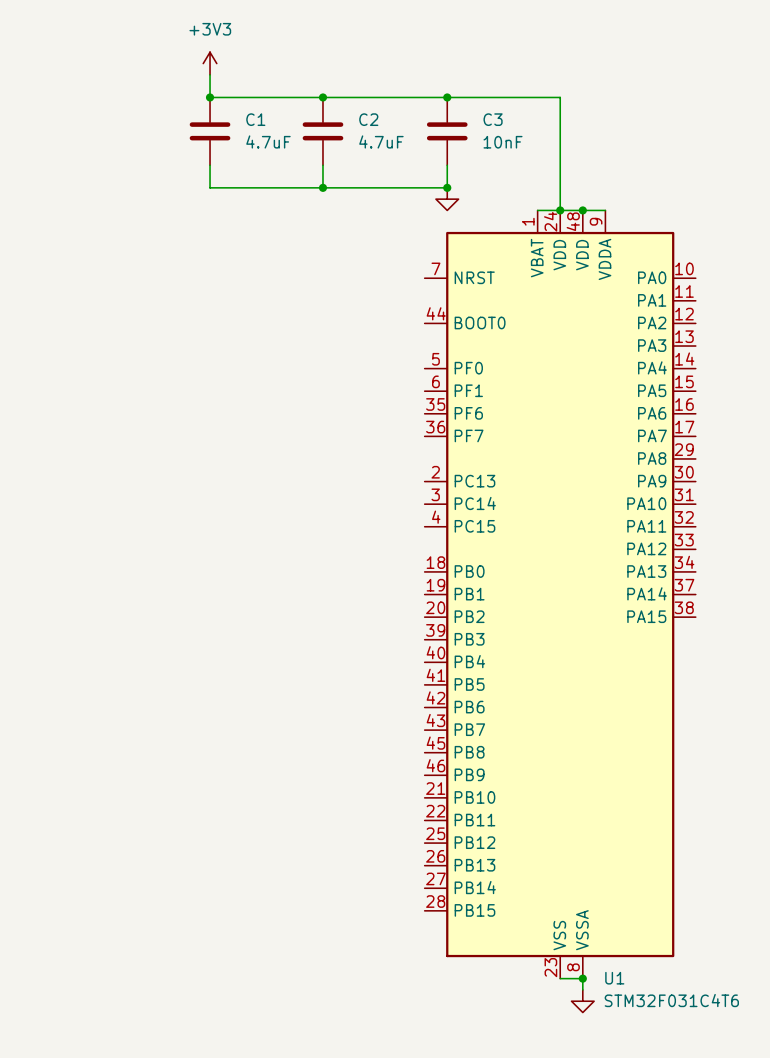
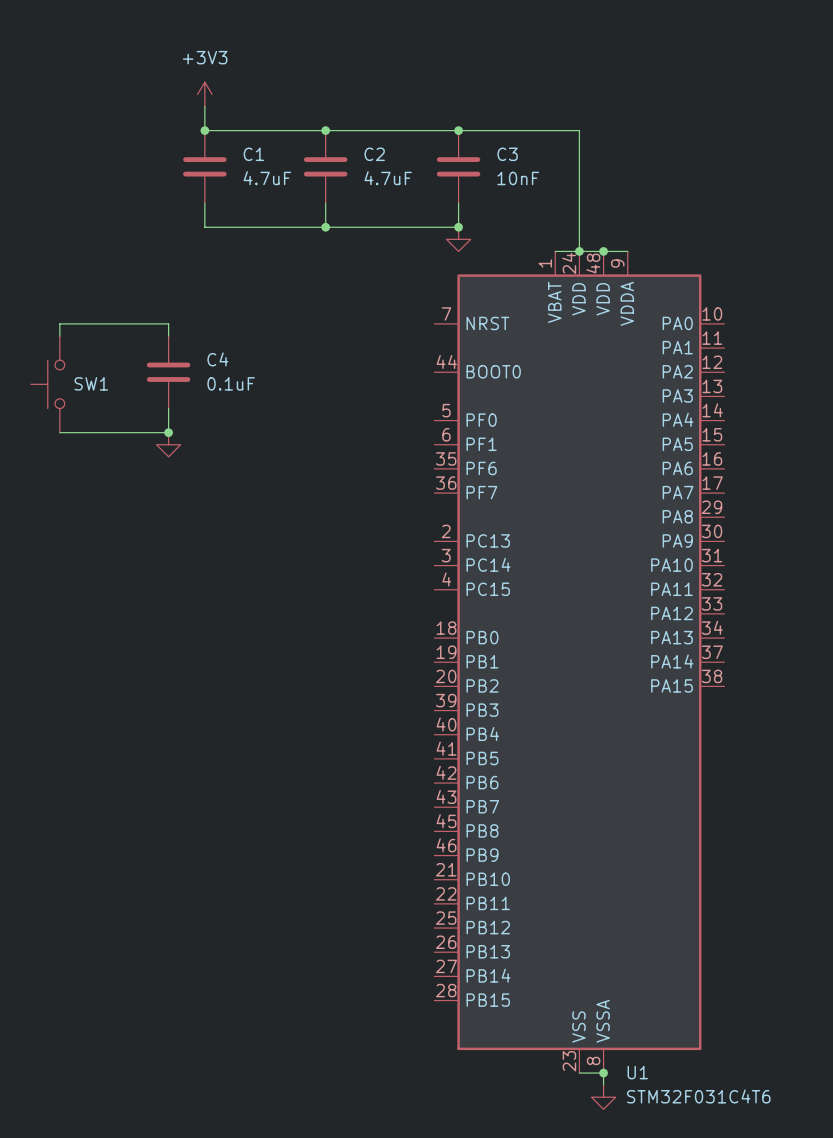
wire: none -> (59, 336) (59, 323) (168, 323) (168, 336)
C4: none -> 0.1uF (168, 372)
SW1: none -> (47, 384)
wire: none -> (168, 408) (168, 432) (59, 432)
junction: none -> (168, 432)
power symbol: none -> (168, 444)

